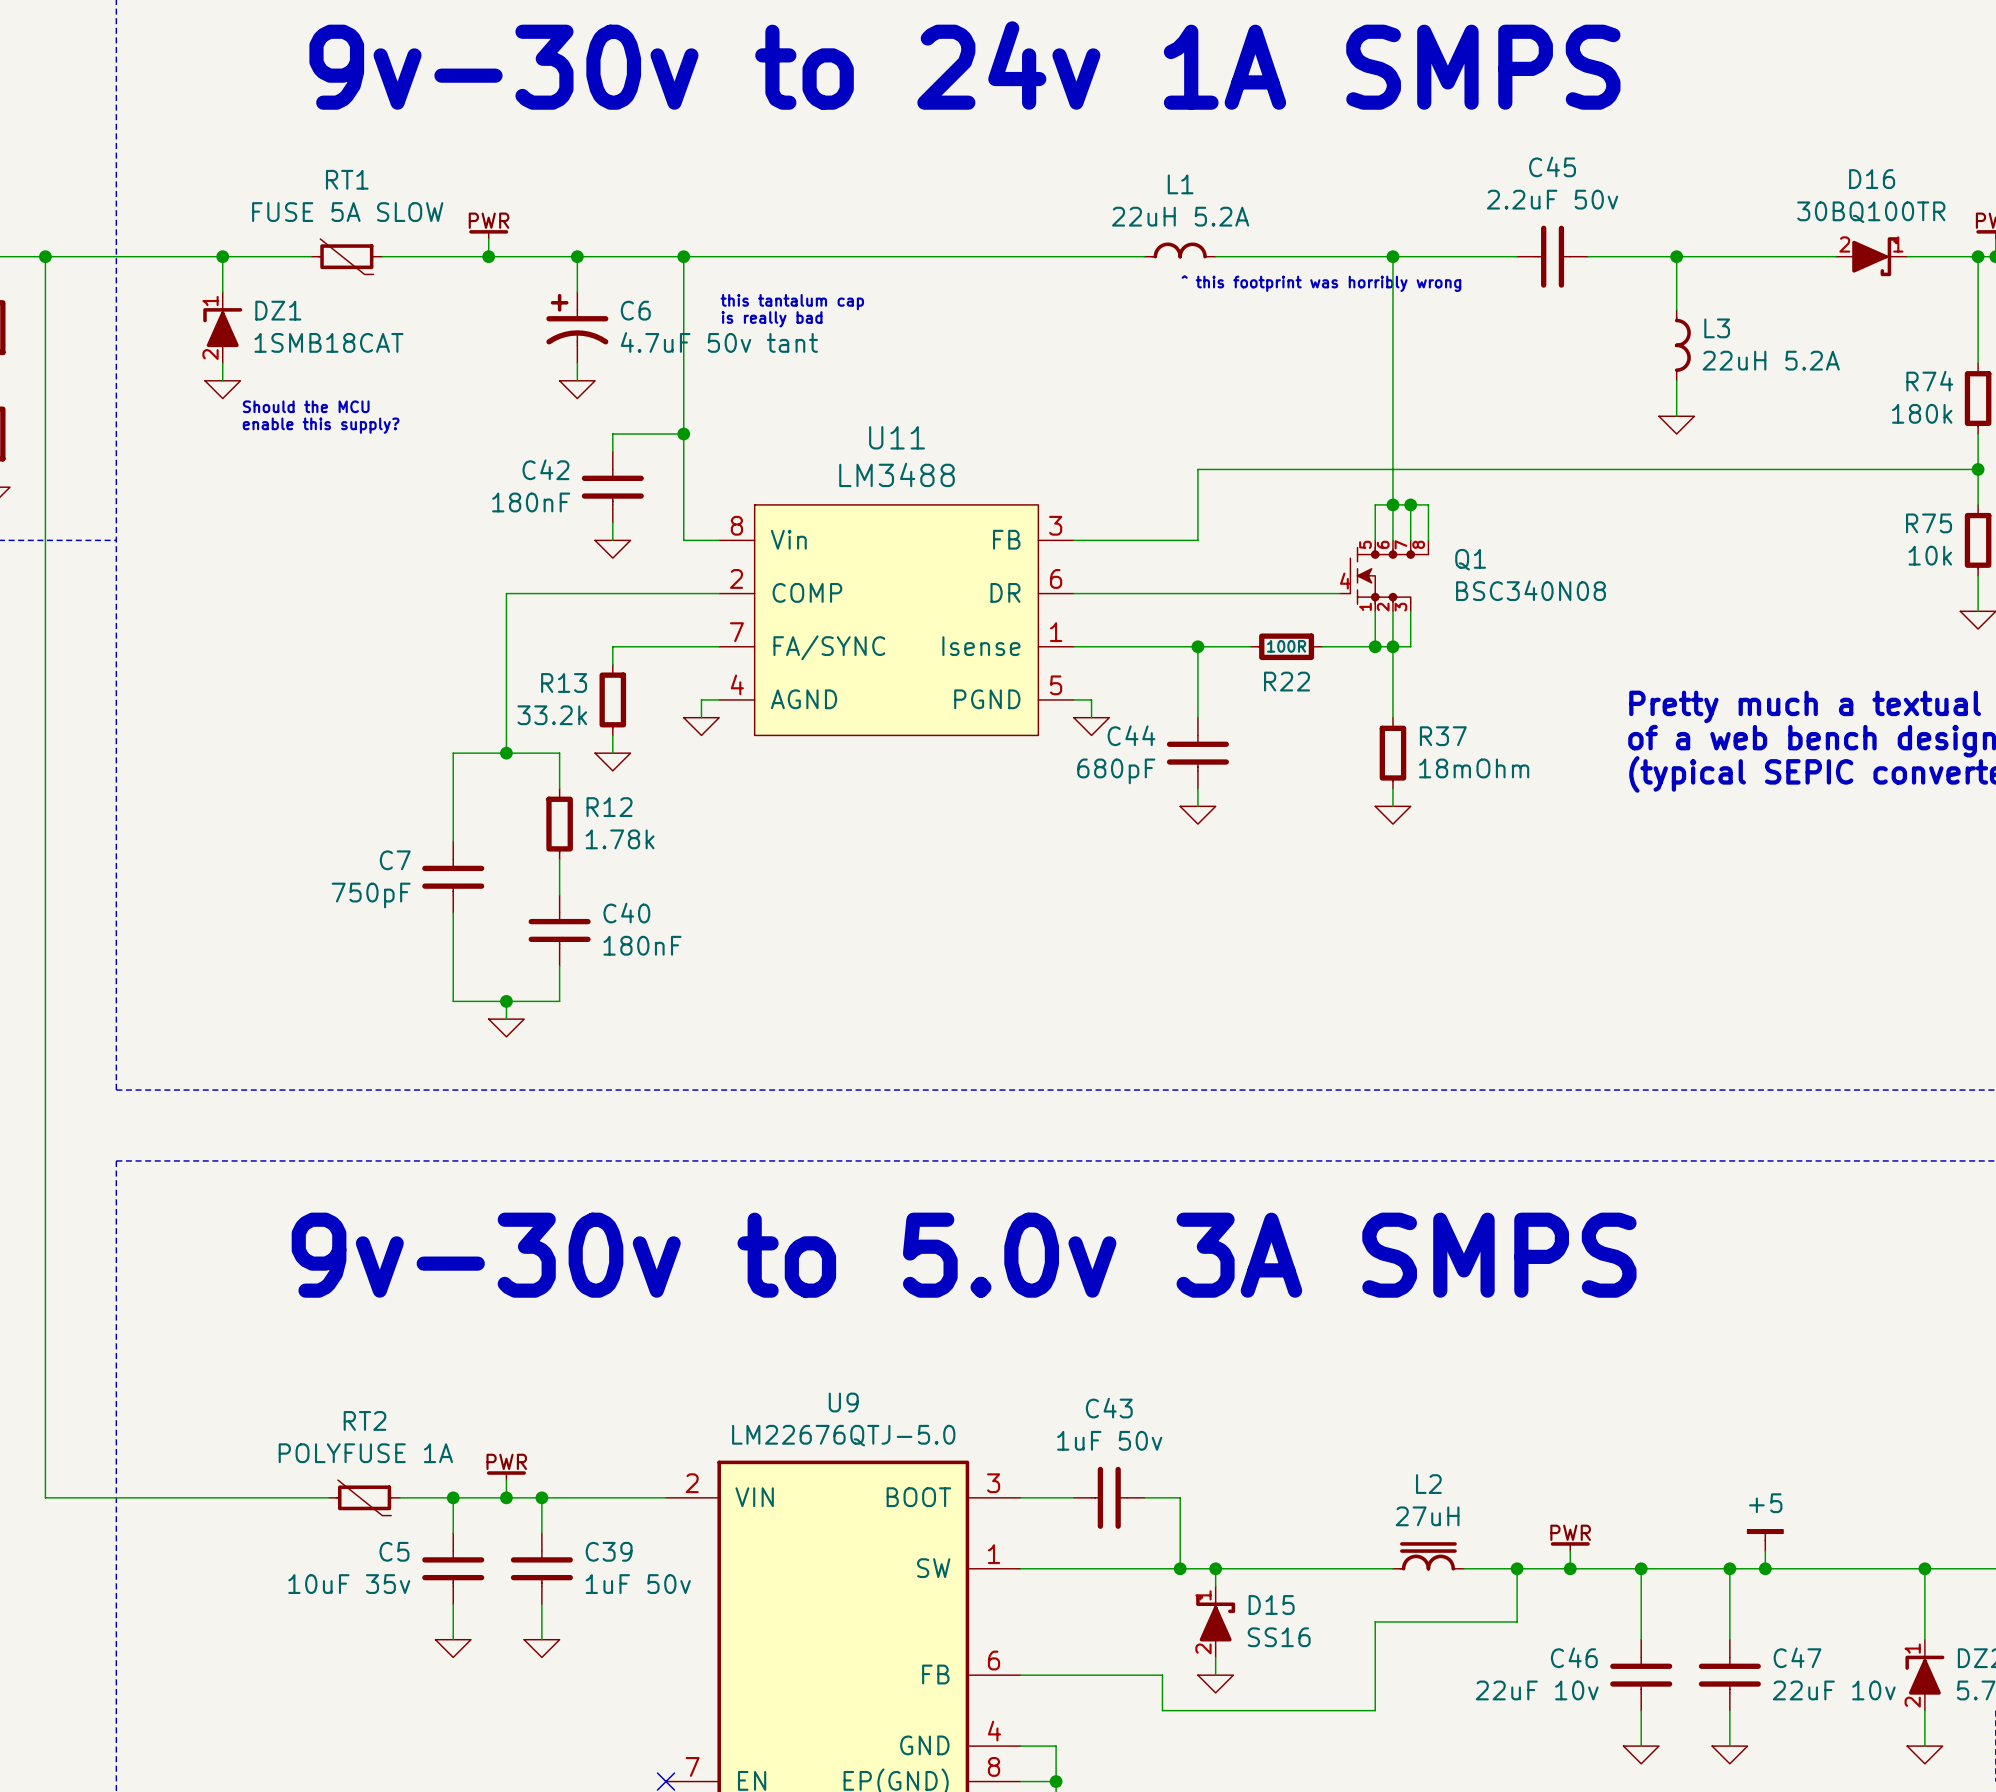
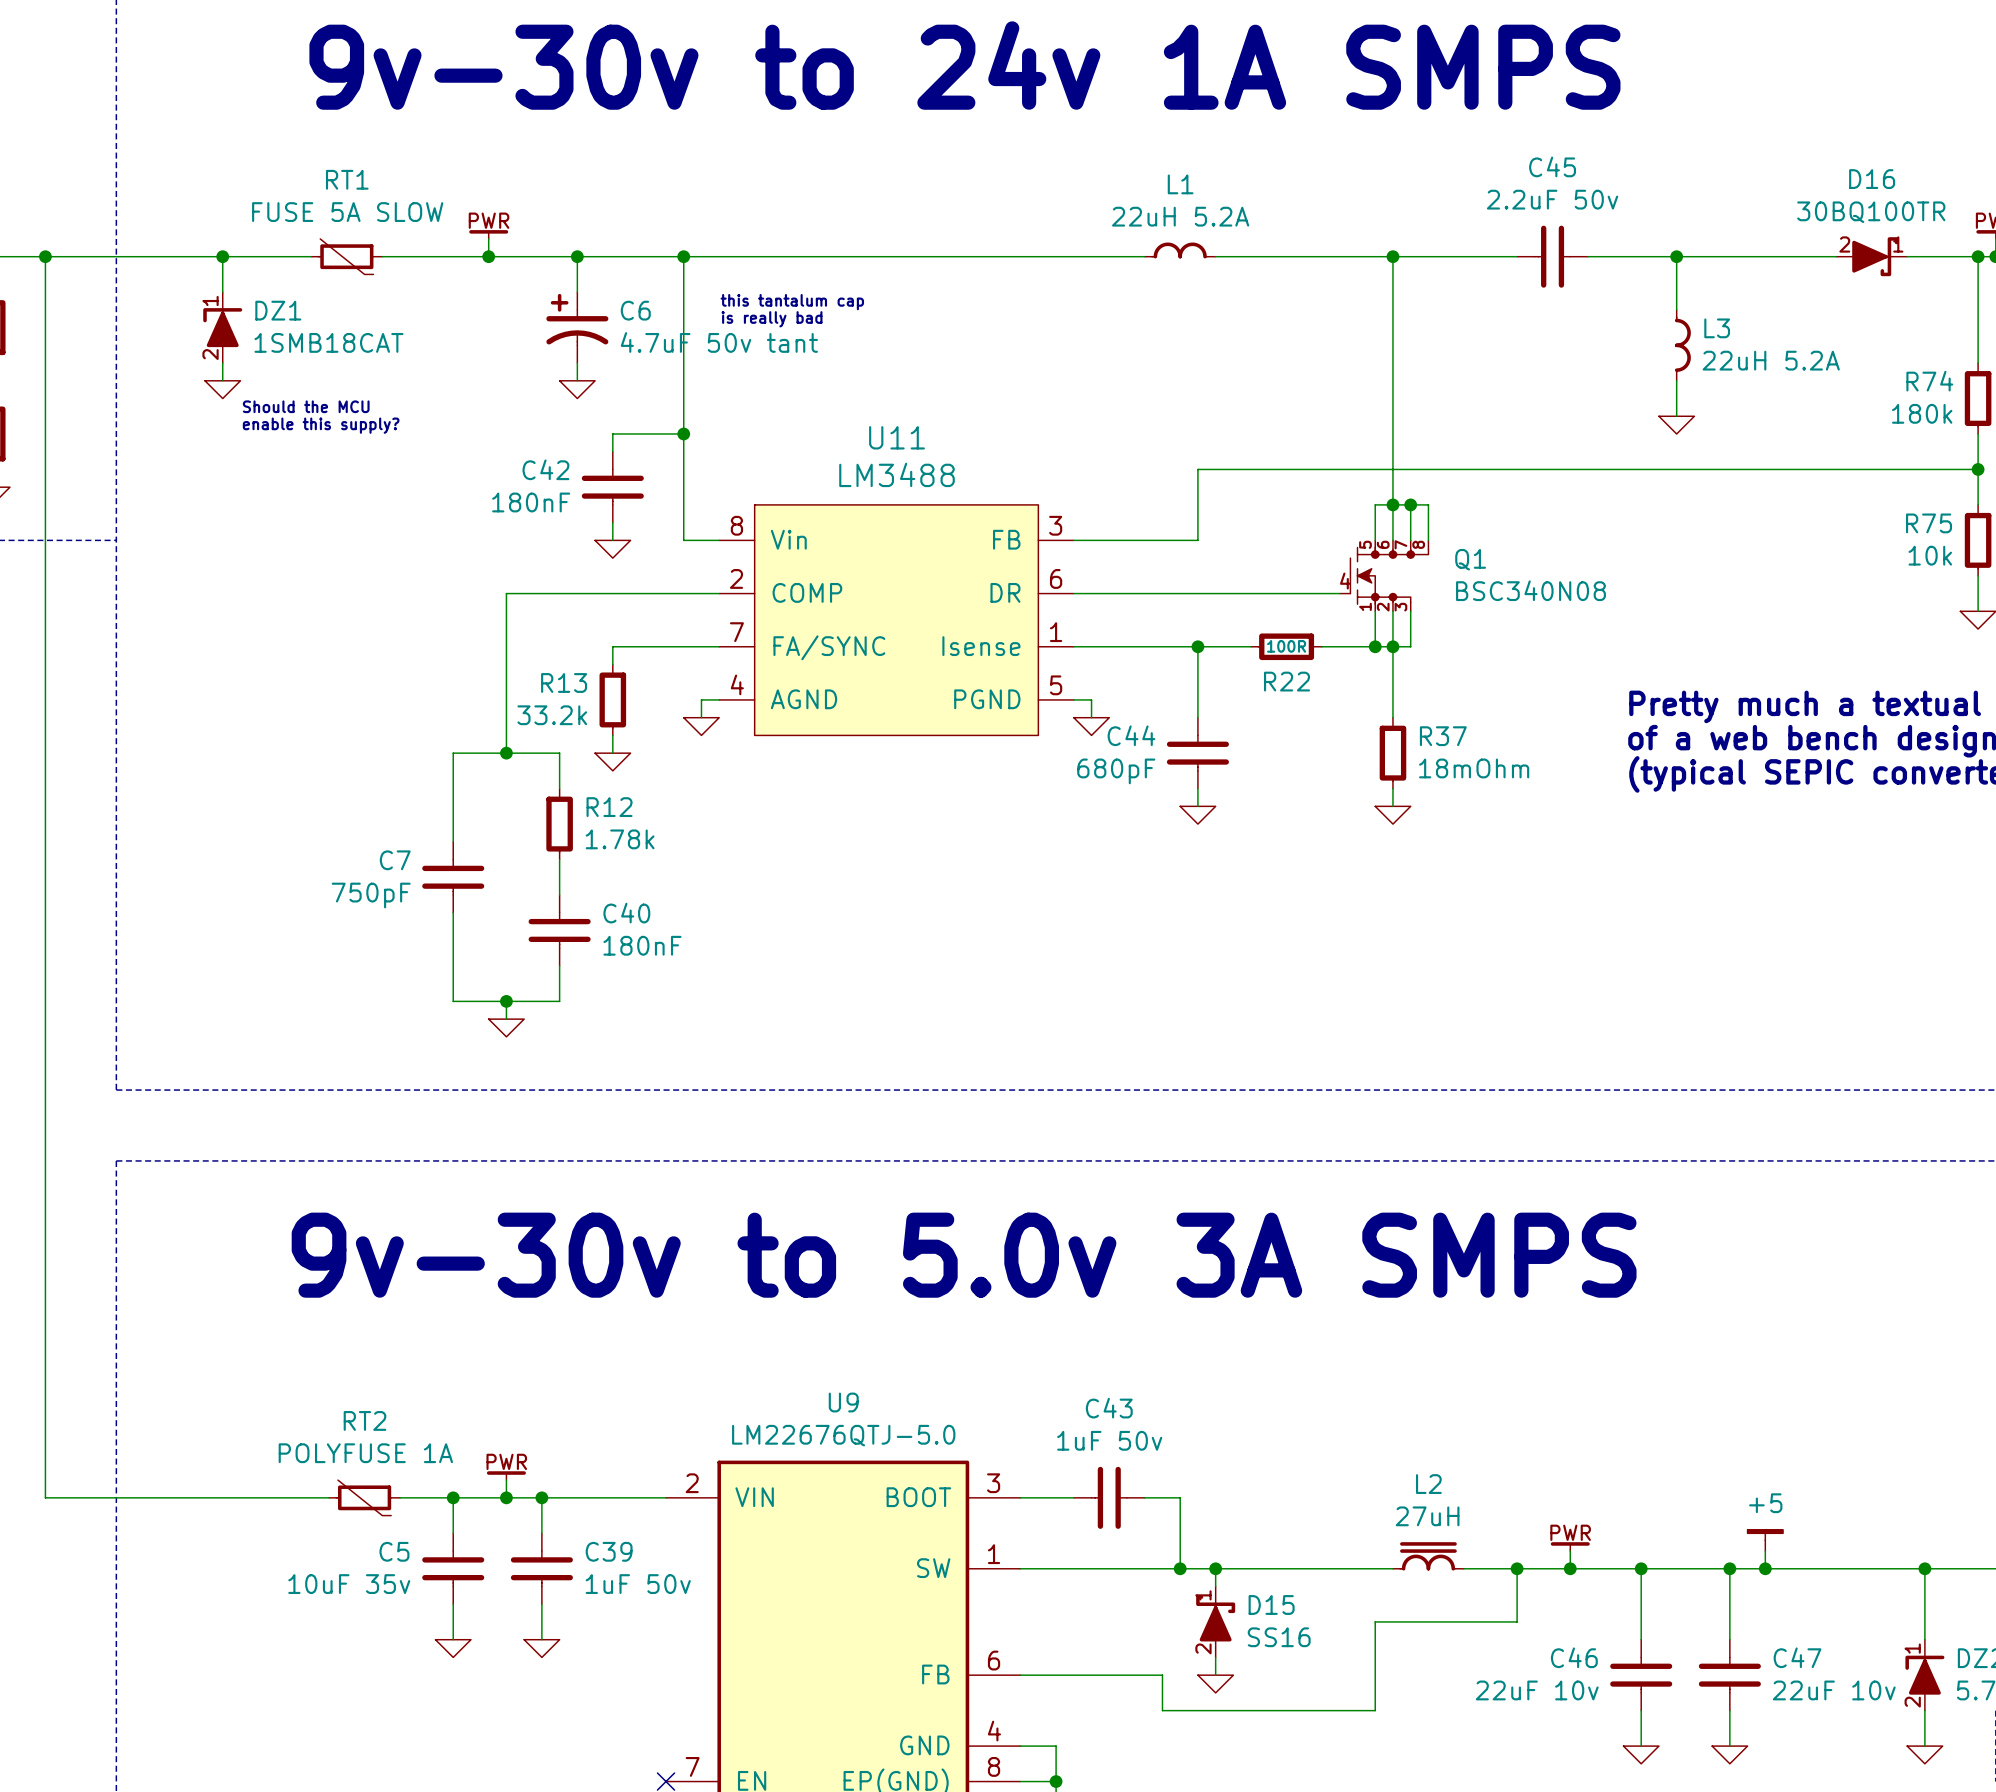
text: ^ this footprint was horribly wrong (1321, 283) -> none

